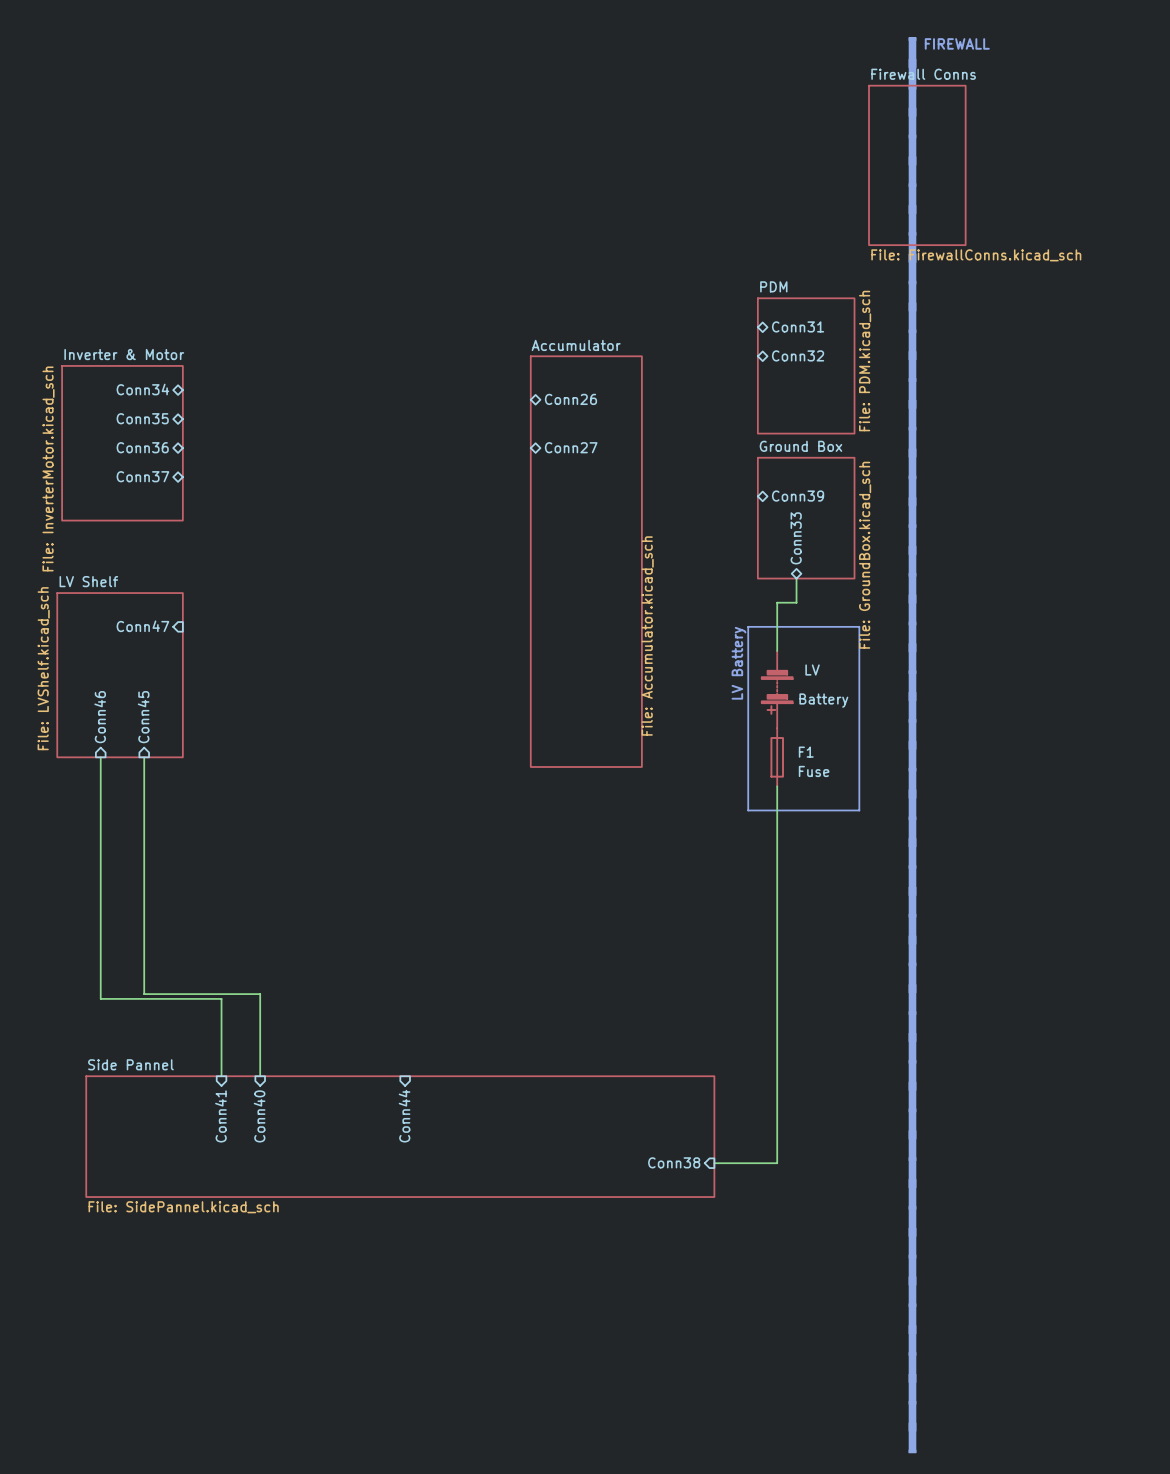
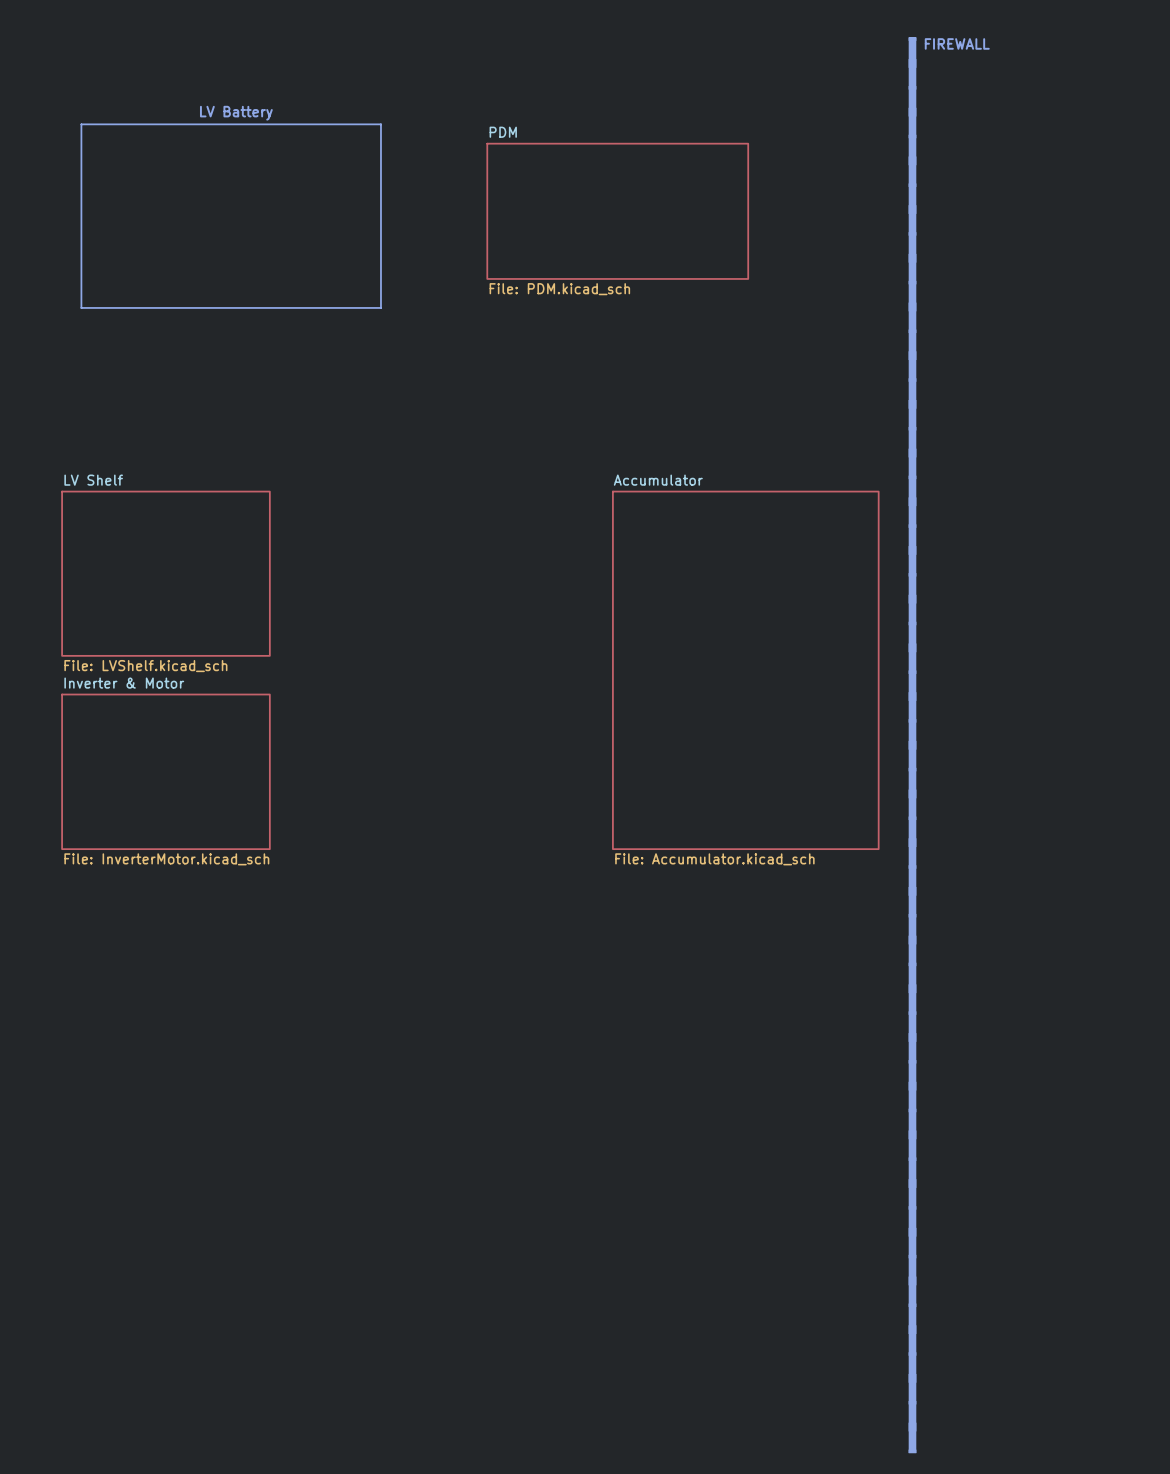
text: none -> LV Battery (236, 113)
line: none -> (81, 124) (380, 124) (380, 307) (81, 307) (81, 124)
sheet Firewall Conns: File: FirewallConns.kicad_sch (917, 165) -> none
sheet PDM: none -> File: PDM.kicad_sch (617, 211)
sheet pin: Conn31 (798, 326) -> none
sheet pin: Conn32 (798, 355) -> none
sheet PDM: File: PDM.kicad_sch (806, 365) -> none
sheet pin: Conn34 (142, 389) -> none
sheet pin: Conn26 (570, 399) -> none
sheet pin: Conn35 (142, 418) -> none
sheet Inverter & Motor: File: InverterMotor.kicad_sch (122, 443) -> none
sheet pin: Conn36 (142, 447) -> none
sheet pin: Conn27 (571, 447) -> none
sheet pin: Conn37 (142, 476) -> none
sheet pin: Conn39 (798, 496) -> none
sheet Ground Box: File: GroundBox.kicad_sch (806, 518) -> none
sheet pin: Conn33 (796, 538) -> none
sheet Accumulator: File: Accumulator.kicad_sch (586, 561) -> none
sheet LV Shelf: none -> File: LVShelf.kicad_sch (165, 573)
wire: (796, 578) (796, 602) (777, 602) (777, 651) -> none
sheet pin: Conn47 (142, 626) -> none
line: (748, 626) (859, 626) (859, 810) (748, 810) (748, 626) -> none
text: LV Battery (738, 663) -> none
sheet Accumulator: none -> File: Accumulator.kicad_sch (745, 670)
sheet LV Shelf: File: LVShelf.kicad_sch (120, 675) -> none
LV: Battery (777, 689) -> none
sheet pin: Conn46 (100, 717) -> none
sheet pin: Conn45 (143, 717) -> none
wire: (100, 757) (100, 998) (221, 998) (221, 1076) -> none
wire: (144, 757) (144, 994) (260, 994) (260, 1076) -> none
F1: Fuse (777, 757) -> none
sheet Inverter & Motor: none -> File: InverterMotor.kicad_sch (165, 771)
wire: (777, 786) (777, 1163) (714, 1163) -> none
sheet pin: Conn41 (220, 1116) -> none
sheet pin: Conn40 (259, 1116) -> none
sheet pin: Conn44 (404, 1116) -> none
sheet Side Pannel: File: SidePannel.kicad_sch (400, 1136) -> none
sheet pin: Conn38 (674, 1162) -> none

